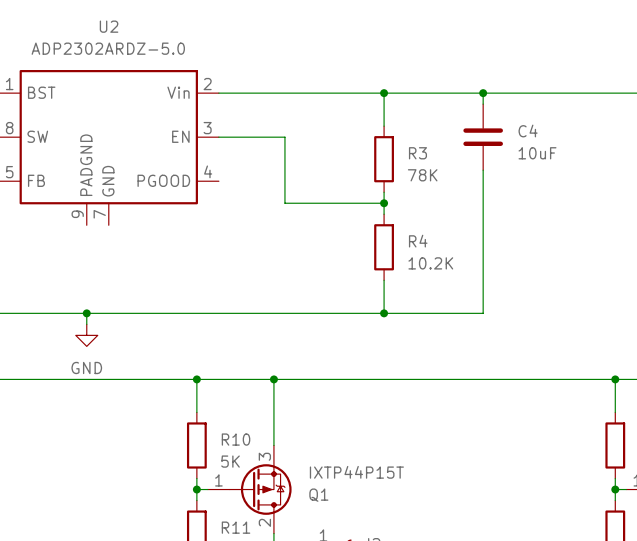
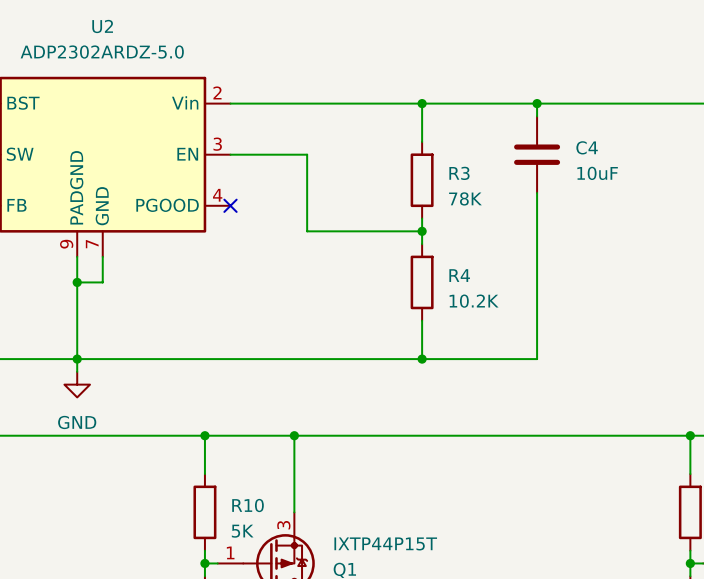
no-connect mark: none -> (230, 205)
wire: none -> (77, 256) (77, 359)
wire: none -> (102, 256) (102, 282) (77, 282)
junction: none -> (77, 282)

